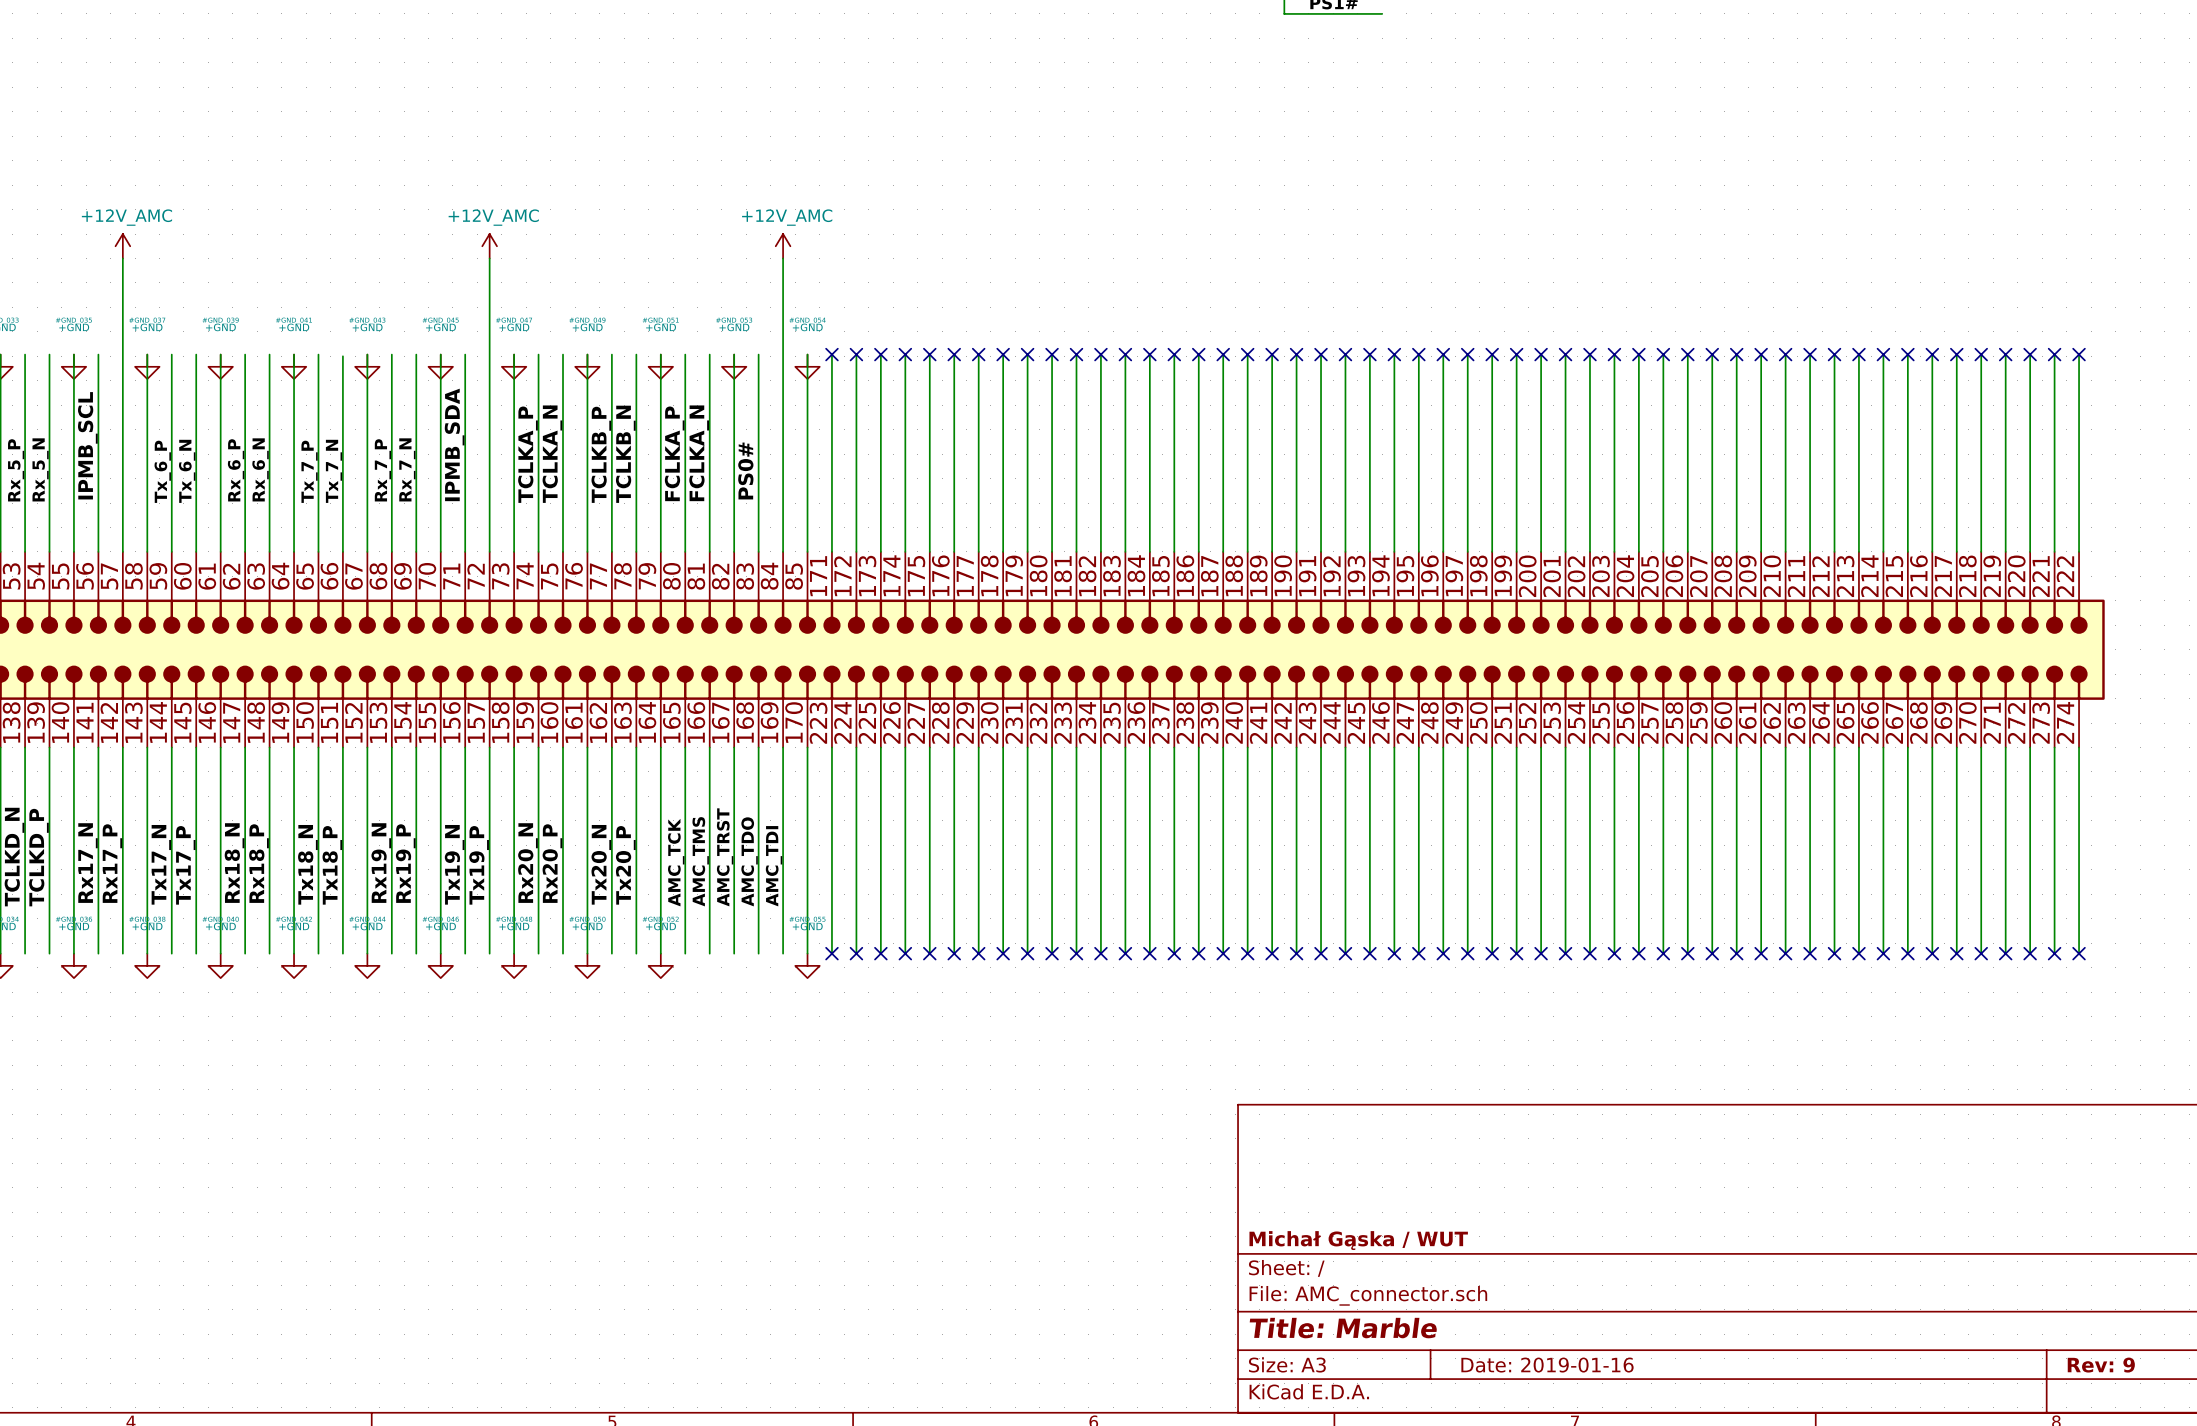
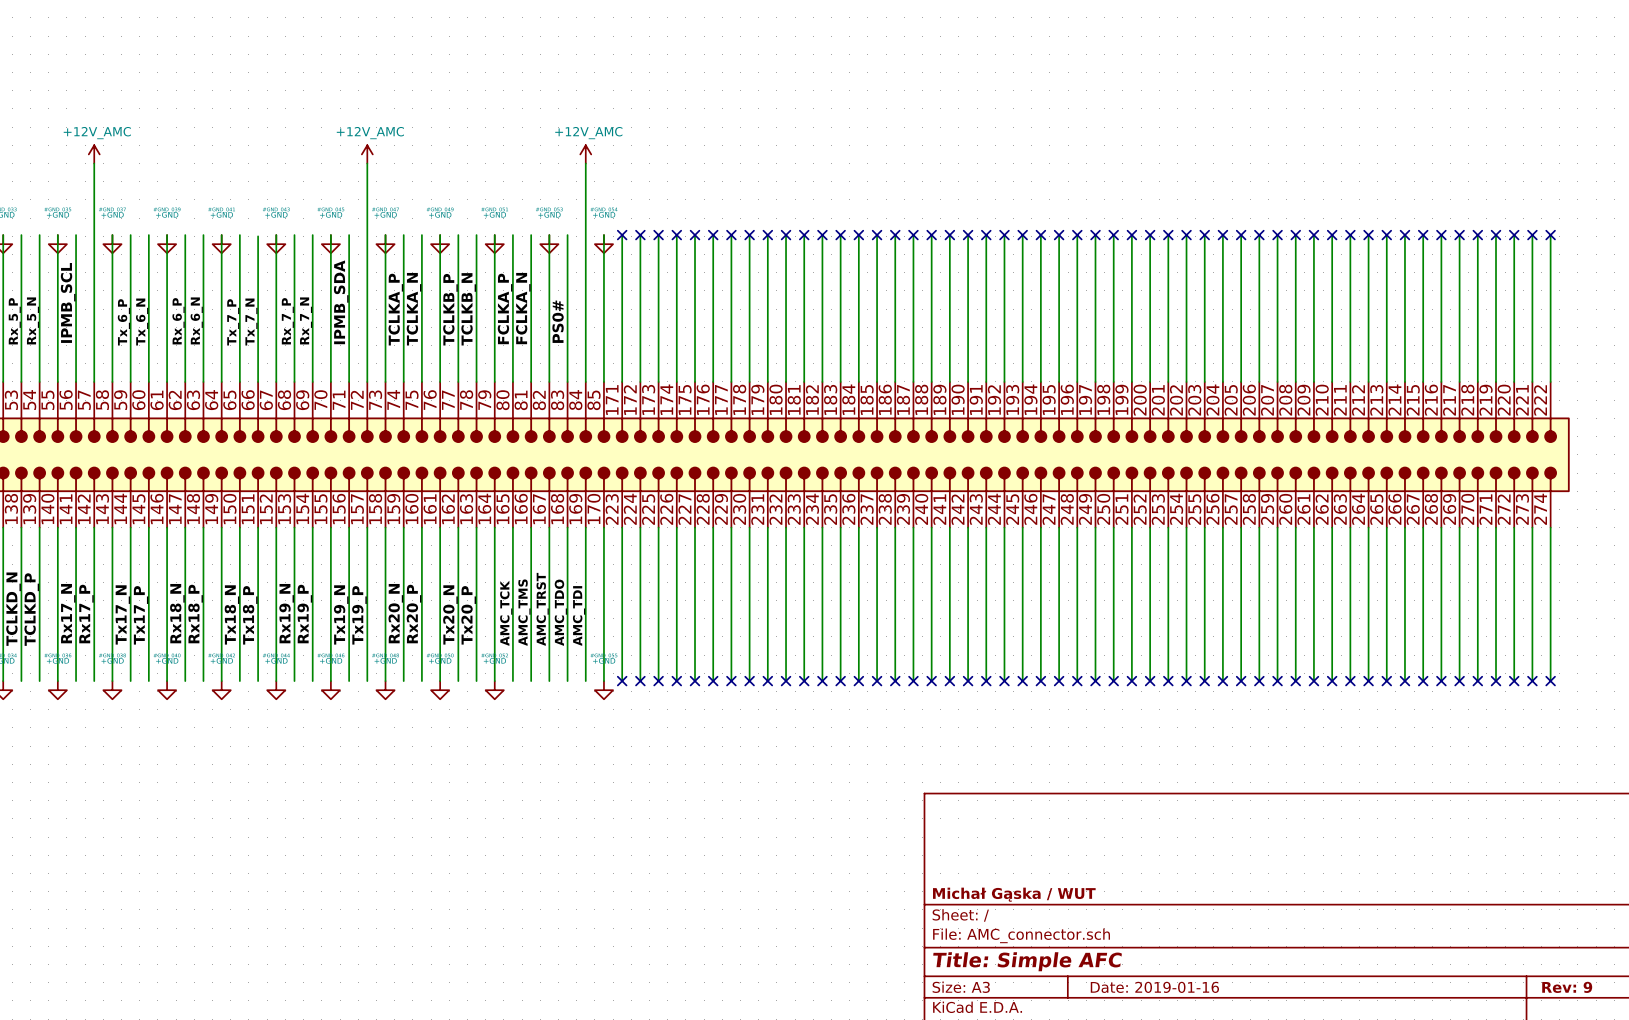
title block: Title: Marble (1343, 1328) -> Title: Simple AFC (1027, 961)

